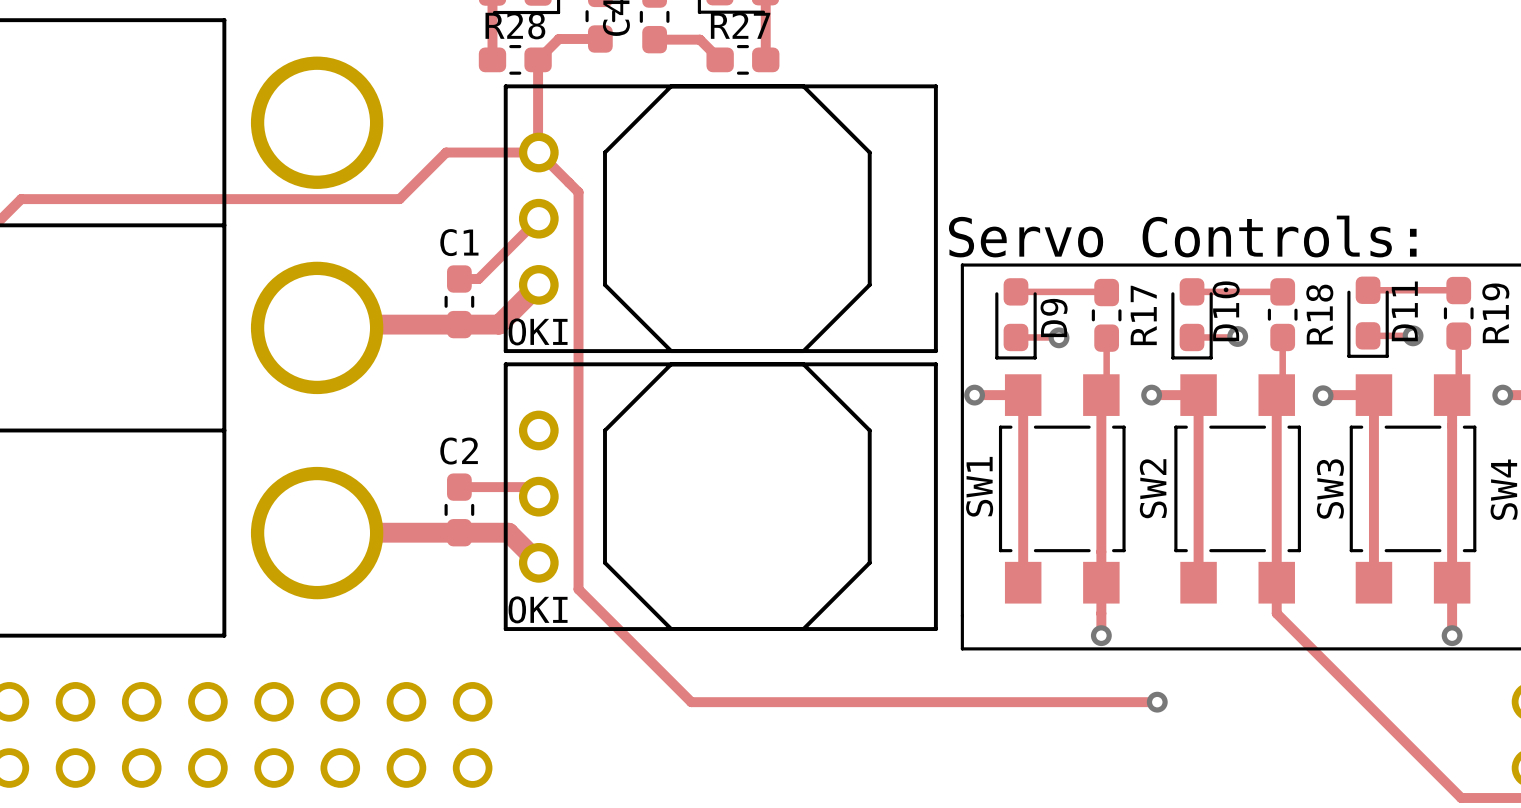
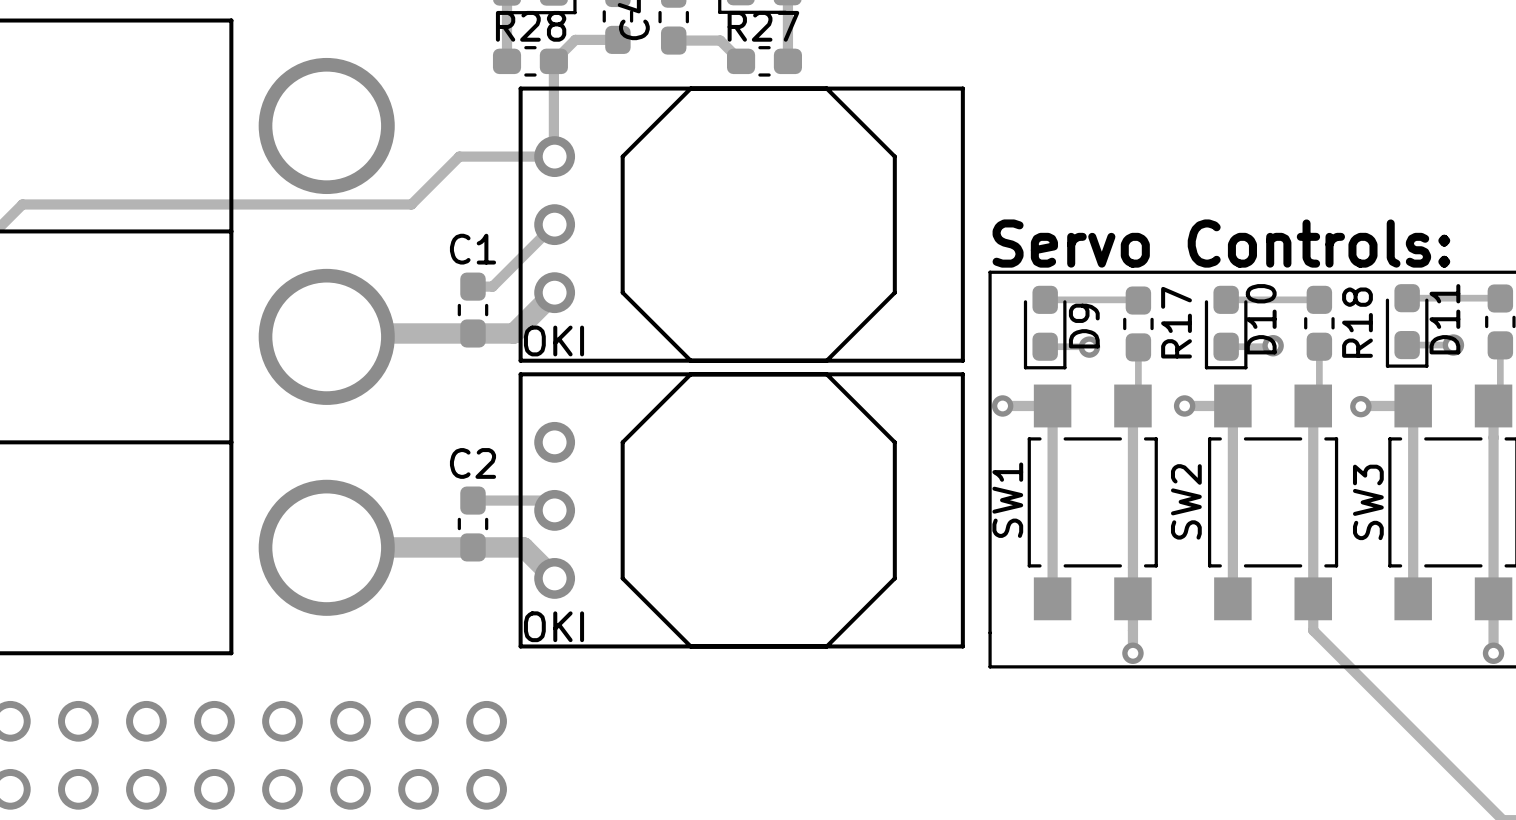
track: (538, 152) (578, 192) (578, 589) (691, 702) (1157, 702) -> none
via: (1157, 702) -> none

